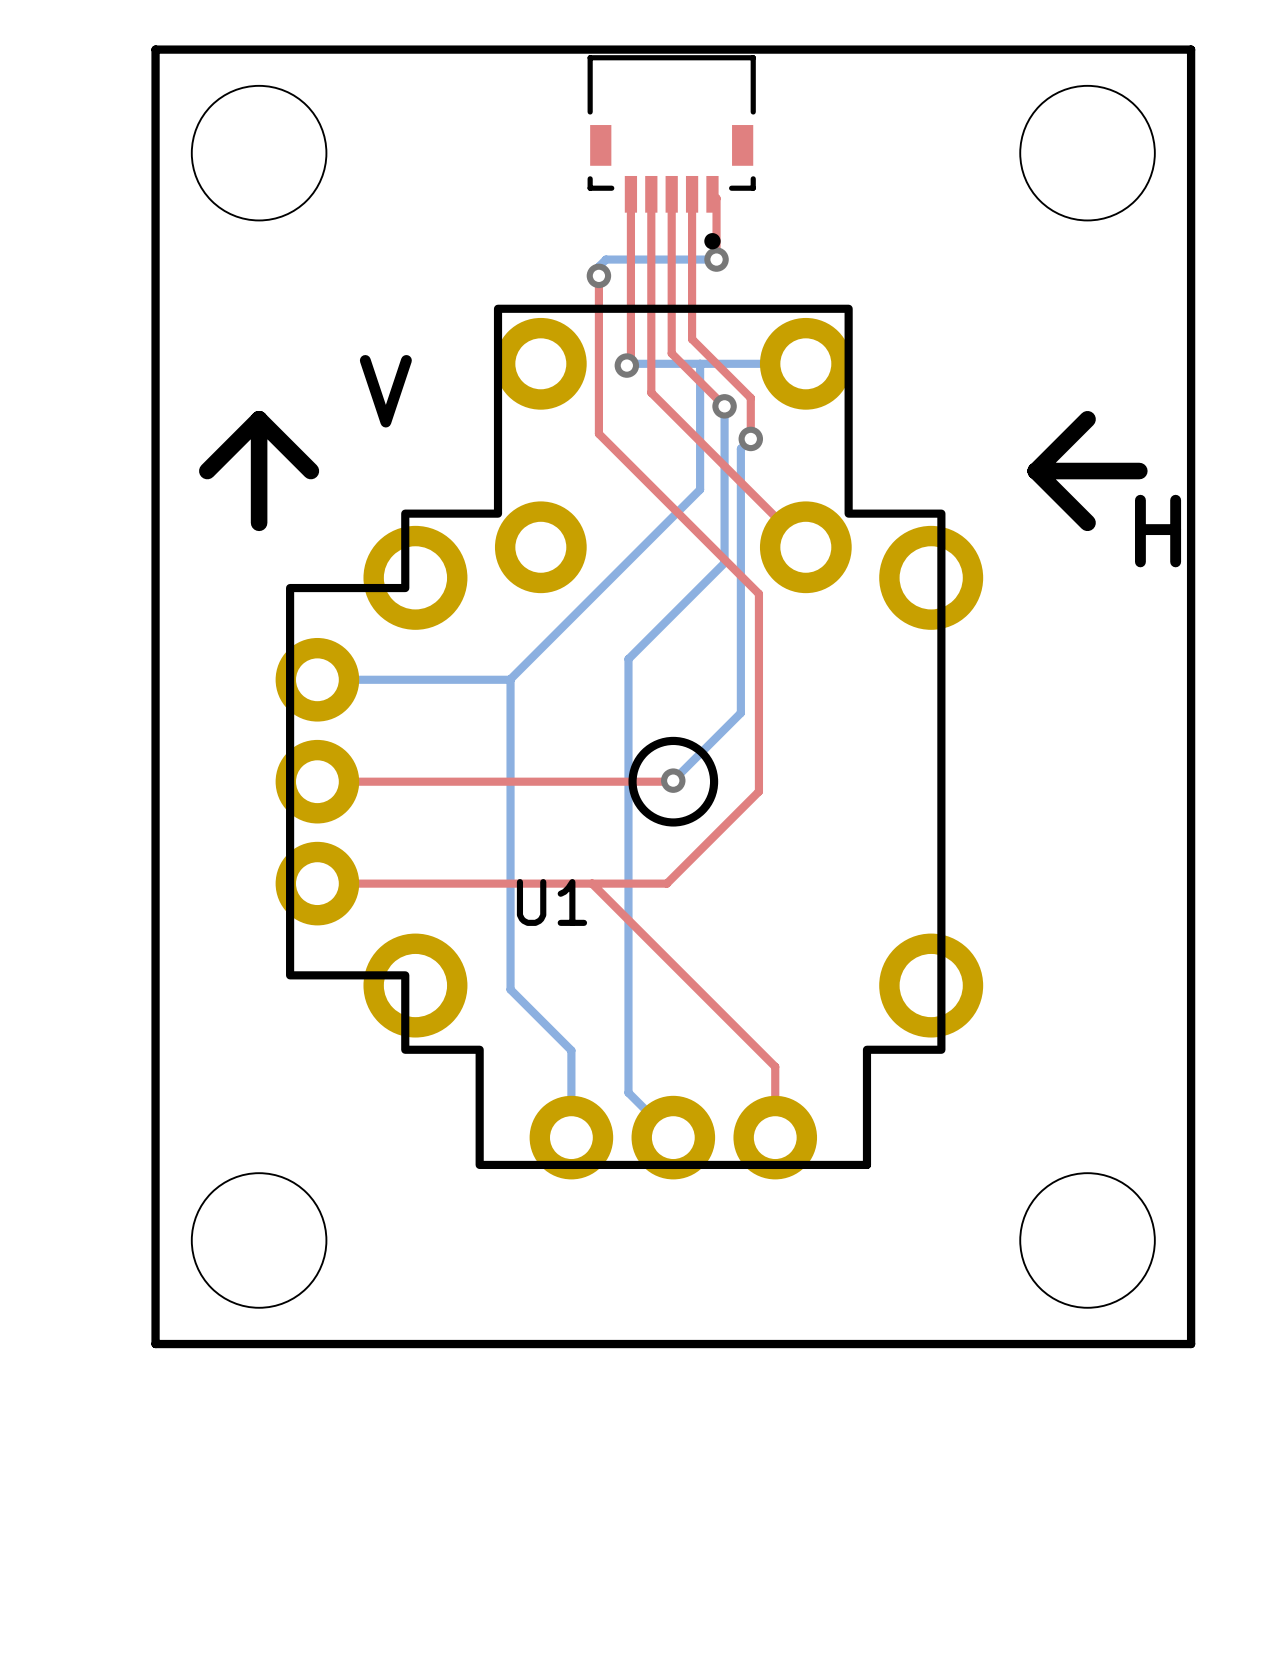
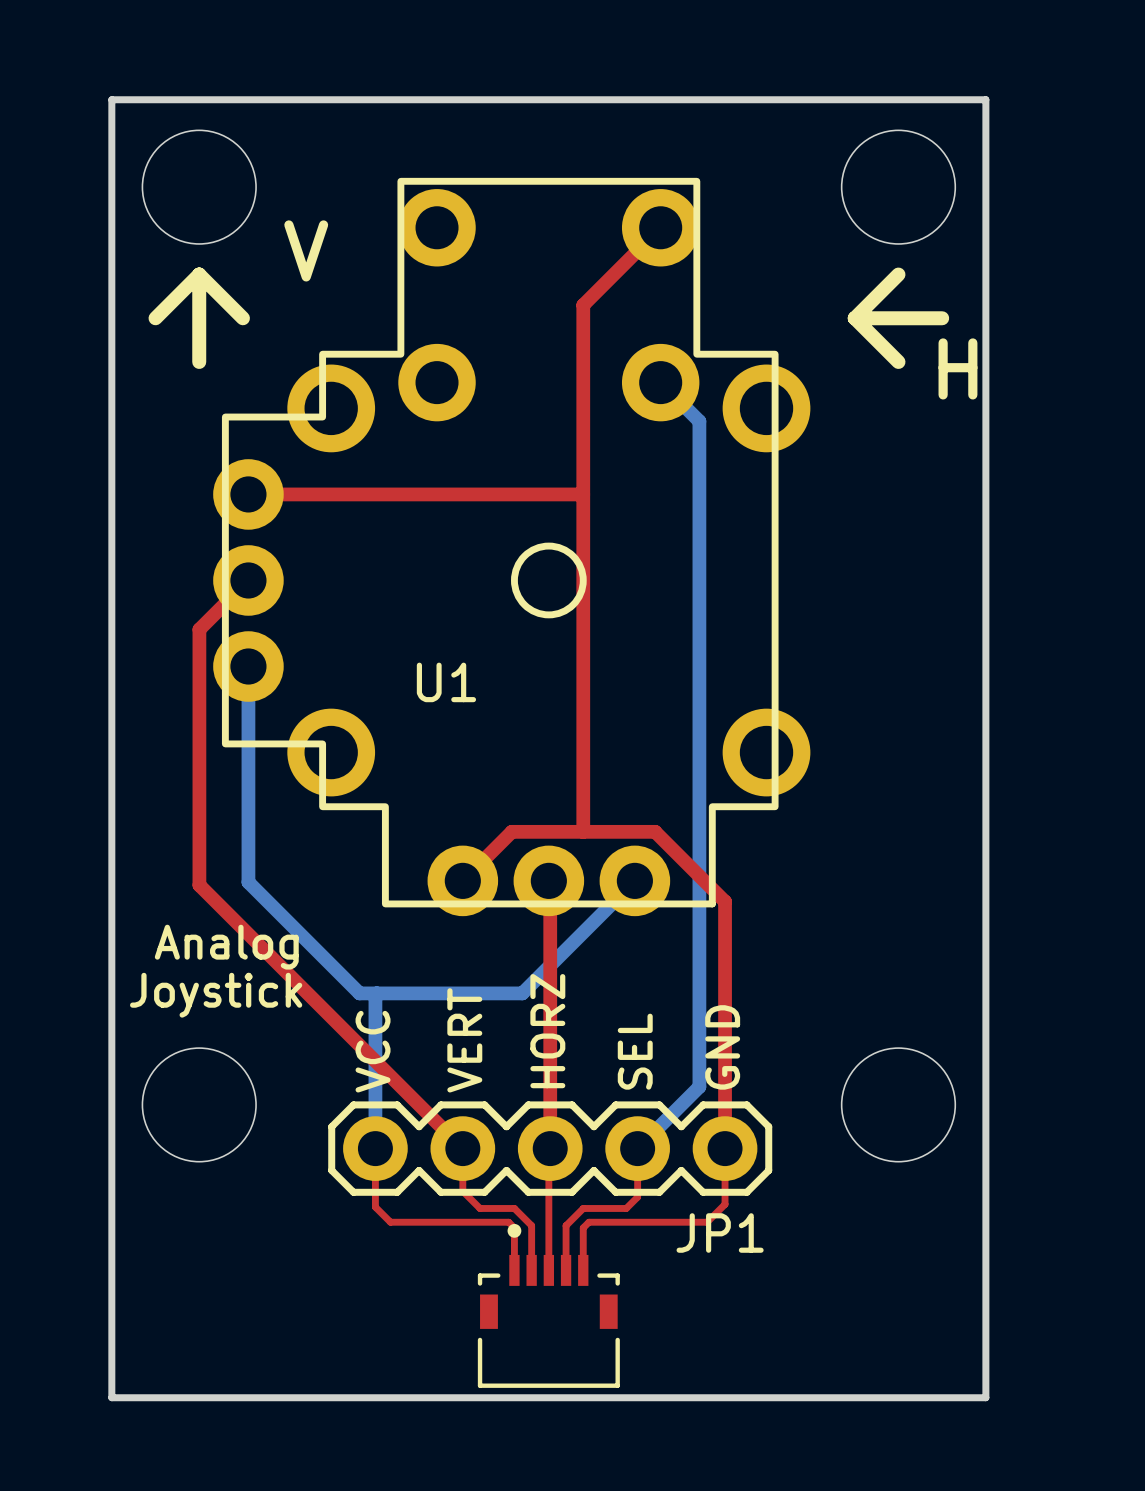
part: (671, 152) -> none
top track: (630, 194) (630, 361) (626, 365) -> none
top track: (651, 194) (651, 392) (805, 547) -> none
top track: (671, 194) (671, 353) (724, 406) -> none
top track: (692, 194) (692, 339) (750, 397) (750, 438) -> none
top track: (712, 194) (716, 198) (716, 259) -> none
top track: none -> (660, 227) (583, 305) (583, 831)
bottom track: (716, 259) (605, 259) (598, 266) (598, 275) -> none
via: (716, 259) -> none
top track: (598, 275) (598, 433) (758, 593) (758, 791) (666, 883) (317, 883) -> none
via: (598, 275) -> none
bottom track: (700, 363) (700, 489) (510, 679) (510, 989) (571, 1050) (571, 1137) -> none
bottom track: (805, 363) (628, 363) (626, 365) -> none
via: (626, 365) -> none
bottom track: none -> (660, 382) (699, 421) (699, 1086) (637, 1148)
text position: V (385, 391) -> V (306, 250)
bottom track: (724, 406) (724, 563) (628, 659) (628, 1092) (673, 1137) -> none
via: (724, 406) -> none
line: (259, 419) (259, 522) -> (199, 274) (199, 361)
line: (259, 419) (310, 471) -> (199, 274) (242, 318)
line: (259, 419) (207, 471) -> (199, 274) (155, 318)
line: (1087, 419) (1035, 471) -> (898, 274) (854, 318)
bottom track: (750, 438) (740, 448) (740, 713) (673, 780) -> none
via: (750, 438) -> none
line: (1035, 471) (1087, 522) -> (854, 318) (898, 361)
line: (1035, 471) (1139, 471) -> (854, 318) (942, 318)
top track: none -> (248, 494) (583, 494)
text position: H (1158, 531) -> H (957, 368)
top track: none -> (248, 580) (199, 629) (199, 885) (462, 1148) (462, 1191) (480, 1208) (514, 1208) (531, 1225) (531, 1270)
bottom track: (317, 679) (510, 679) -> none
bottom track: none -> (248, 666) (248, 882) (359, 993) (522, 993) (634, 880) (634, 889)
U1 position: (629, 742) -> (511, 547)
top track: (673, 780) (317, 781) -> none
via: (673, 780) -> none
top track: (592, 883) (775, 1066) (775, 1137) -> none
top track: none -> (461, 879) (462, 880) (511, 831) (655, 831) (725, 901) (725, 1204) (707, 1222) (588, 1222) (583, 1227) (583, 1270)
top track: none -> (548, 880) (548, 1270)
text: none -> Analog (226, 947)
bottom track: none -> (376, 993) (375, 1148)
text: none -> Joystick (216, 995)
text: none -> HORZ (547, 1031)
text: none -> VERT (464, 1040)
text: none -> GND (722, 1047)
text: none -> VCC (373, 1051)
text: none -> SEL (635, 1051)
top track: none -> (375, 1148) (375, 1207) (390, 1222) (508, 1222) (514, 1227) (514, 1270)
JP1: none -> (550, 1148)
top track: none -> (637, 1148) (637, 1197) (626, 1208) (583, 1208) (566, 1225) (566, 1270)
board edge: (155, 1344) (1191, 1344) -> (111, 1192) (111, 1397) (985, 1397) (985, 1192)
part: none -> (548, 1305)

